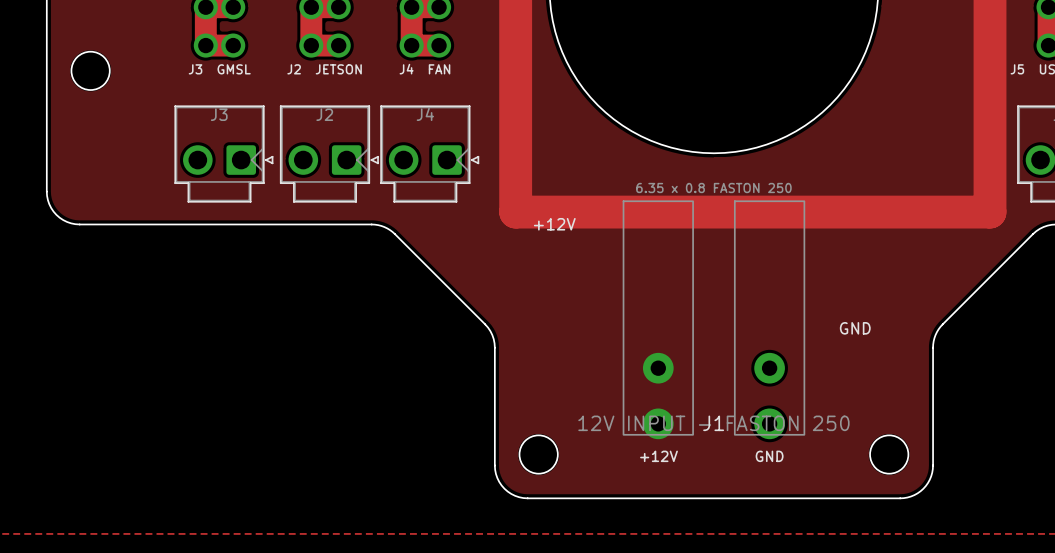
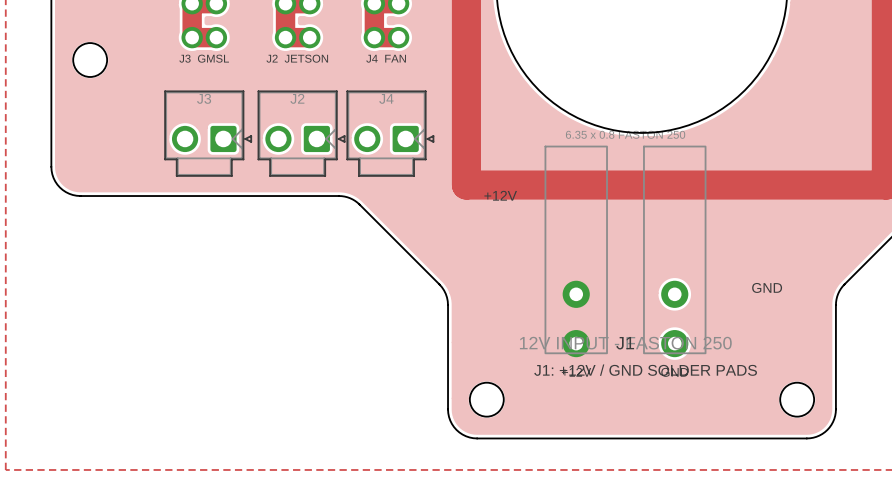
J1 position: (713, 319) -> (625, 251)
text: none -> J1: +12V / GND SOLDER PADS (645, 370)

